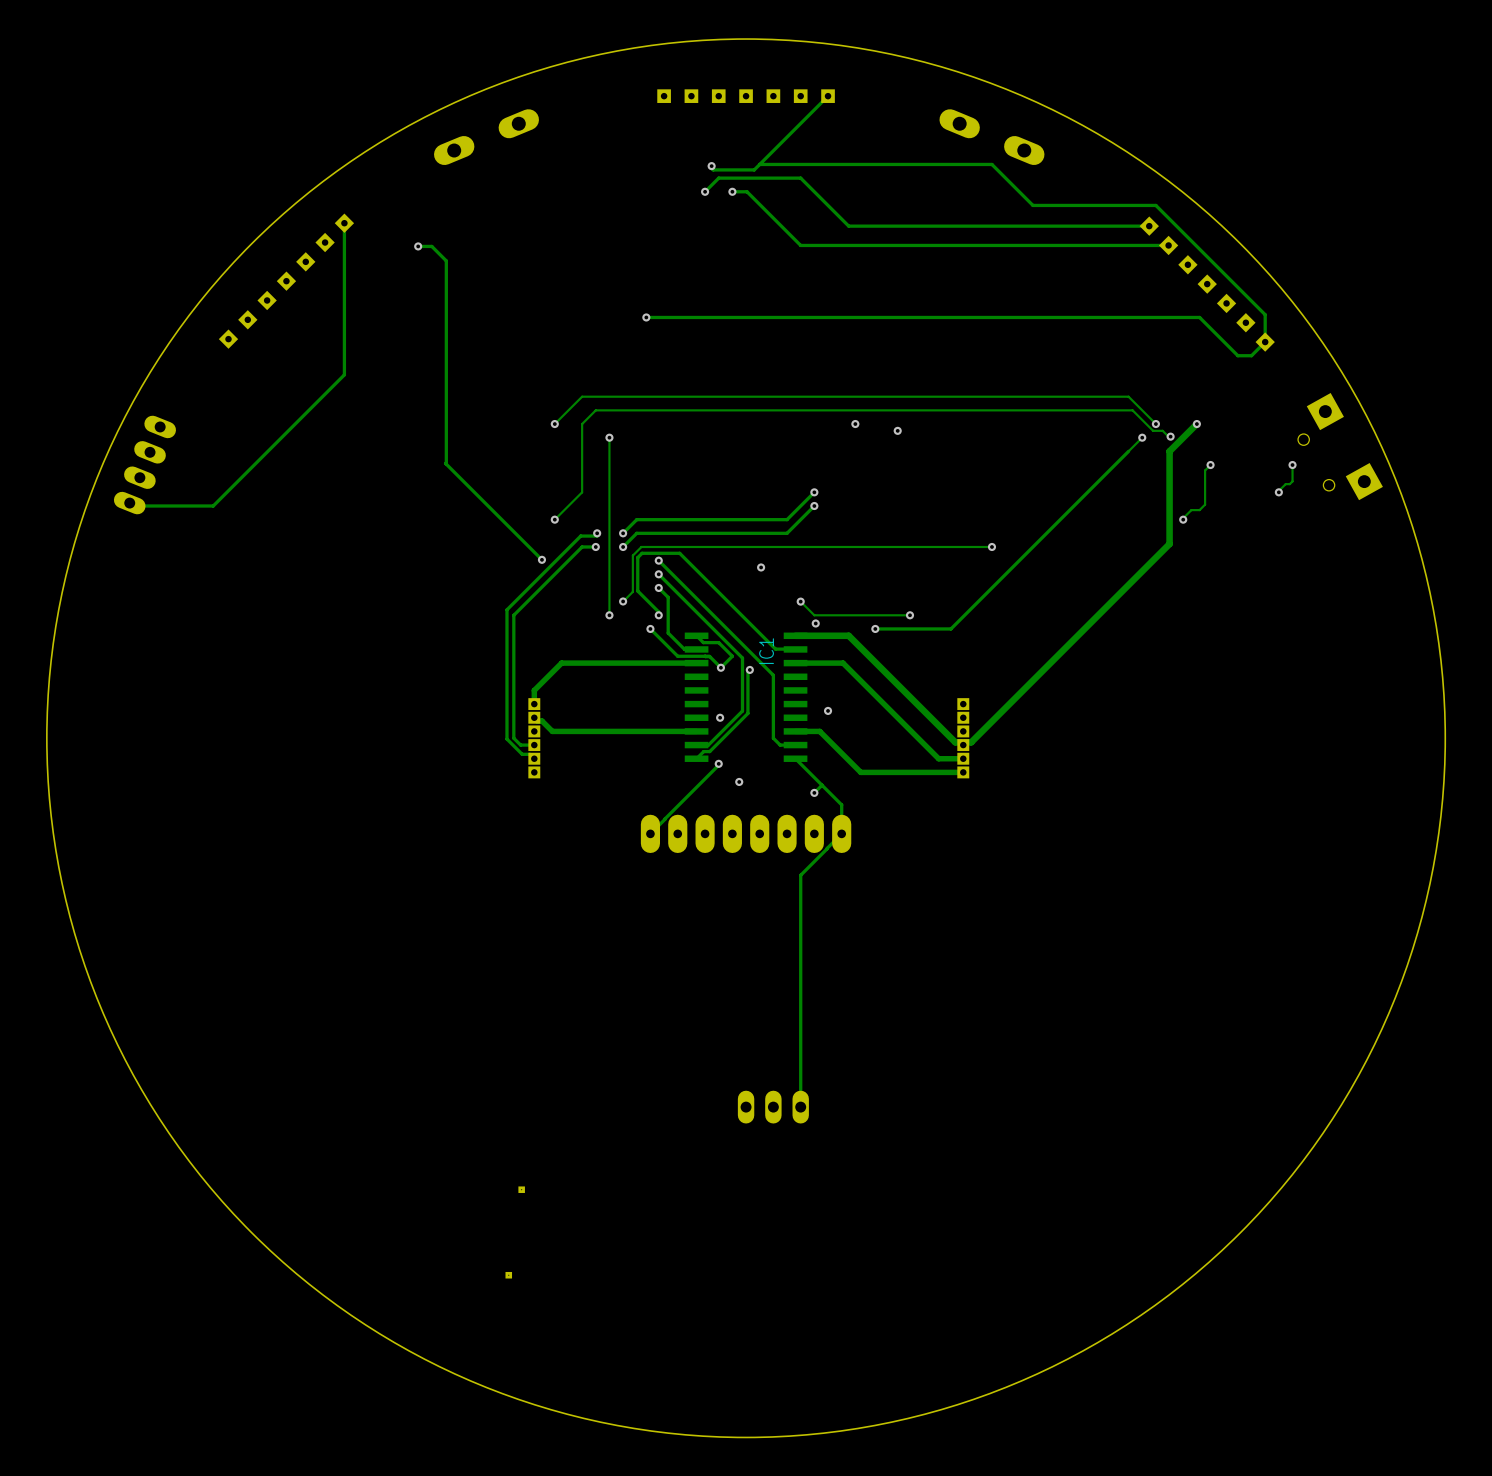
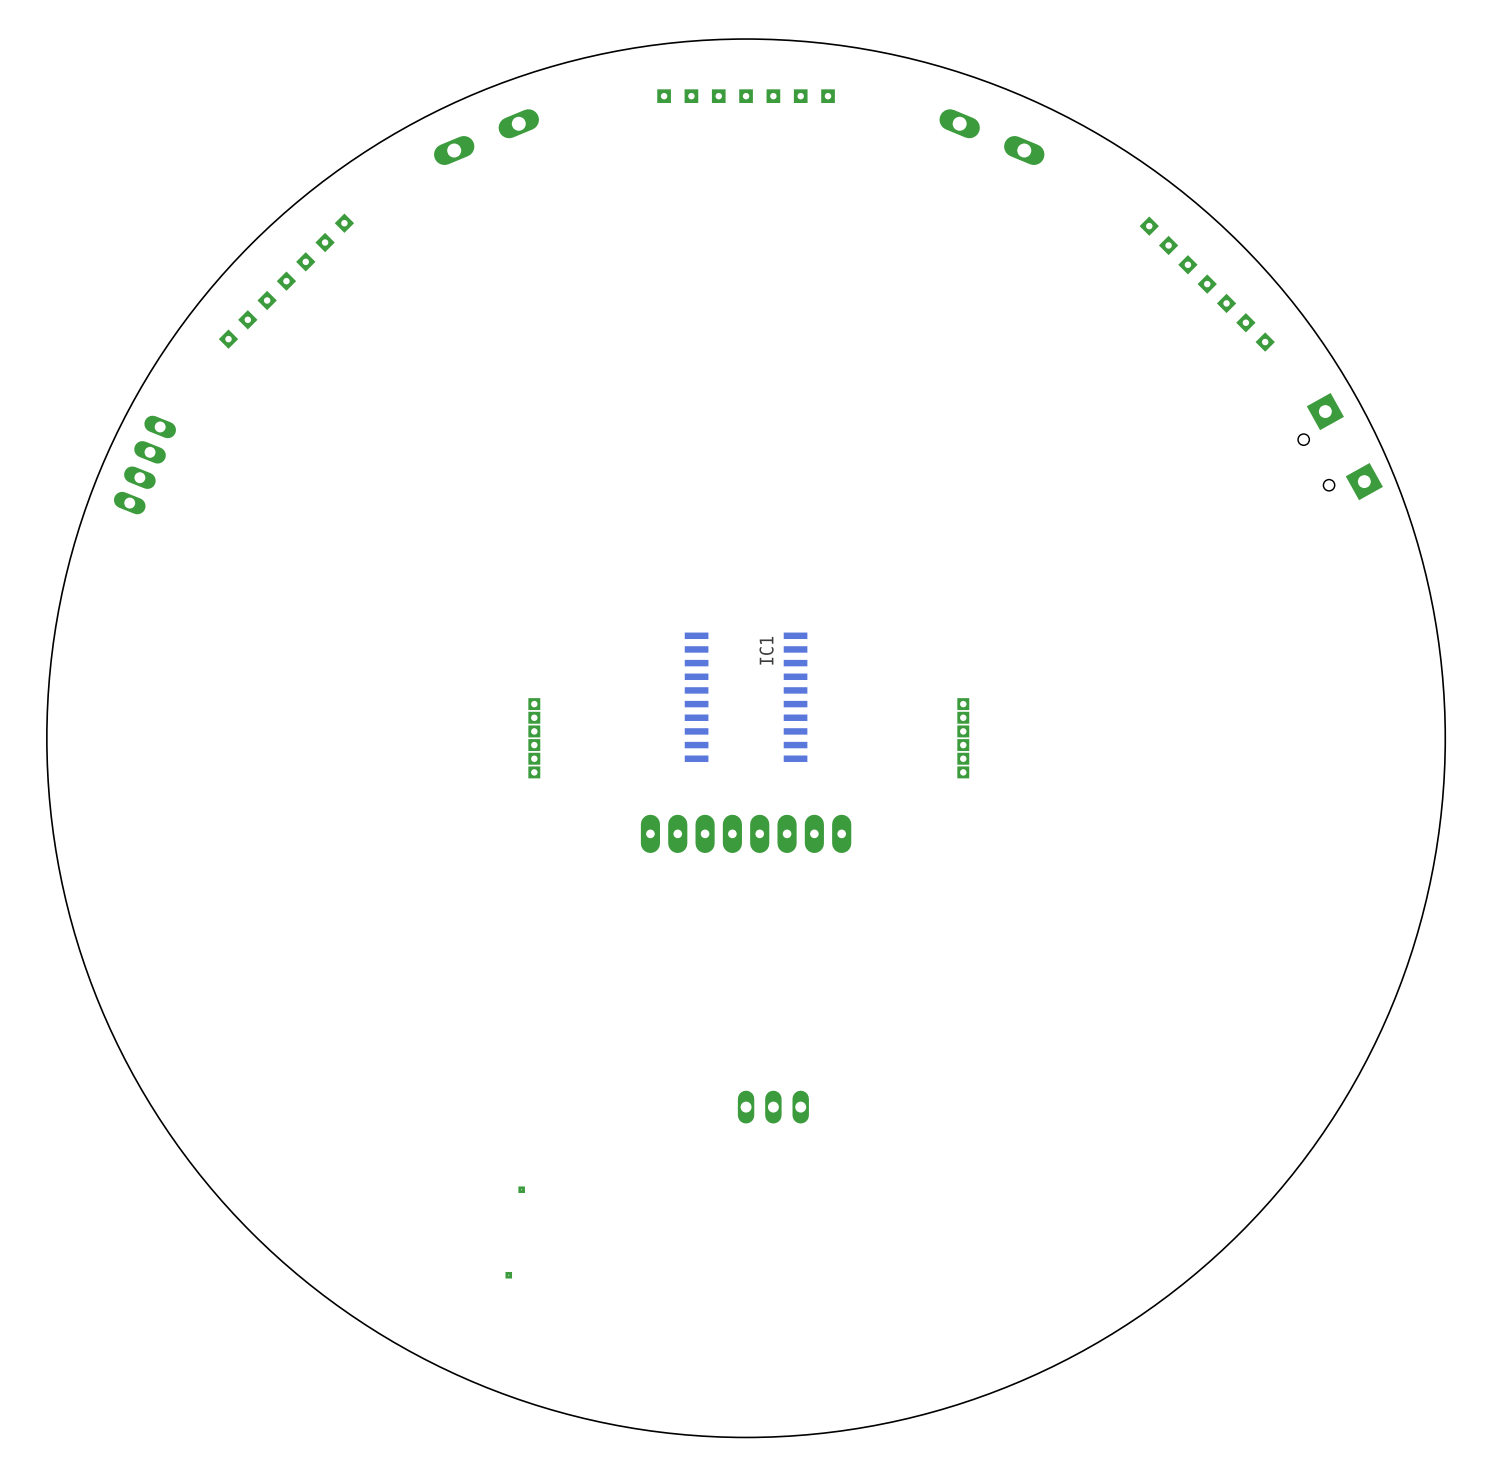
track: (828, 96) (754, 169) (713, 169) (711, 166) -> none
track: (759, 164) (991, 164) (1032, 205) (1155, 205) (1265, 314) (1265, 342) (1251, 355) (1237, 355) (1199, 317) (646, 317) -> none
via: (711, 166) -> none
track: (705, 191) (718, 178) (800, 178) (848, 226) (1149, 226) -> none
via: (705, 191) -> none
track: (732, 191) (747, 191) (800, 245) (1168, 245) -> none
via: (732, 191) -> none
track: (344, 223) (344, 374) (213, 506) (132, 506) (129, 503) -> none
track: (418, 246) (431, 246) (446, 260) (446, 464) -> none
via: (418, 246) -> none
via: (646, 317) -> none
via: (554, 424) -> none
via: (855, 424) -> none
track: (1155, 424) (1128, 396) (582, 396) (554, 424) -> none
via: (1155, 424) -> none
track: (1196, 424) (1169, 451) (1169, 544) (971, 742) (966, 742) (963, 745) (960, 742) (955, 742) (848, 635) (795, 635) -> none
via: (1196, 424) -> none
via: (897, 430) -> none
track: (1170, 436) (1162, 430) (1153, 430) (1132, 410) (595, 410) (582, 424) (582, 492) (554, 519) -> none
via: (1170, 436) -> none
track: (609, 437) (609, 615) -> none
via: (609, 437) -> none
track: (1142, 437) (950, 628) (875, 628) -> none
via: (1142, 437) -> none
track: (445, 463) (541, 559) -> none
track: (1210, 465) (1205, 470) (1205, 504) (1199, 510) (1191, 510) (1183, 519) -> none
via: (1210, 465) -> none
track: (1292, 465) (1292, 481) (1289, 484) (1285, 484) (1278, 492) -> none
via: (1292, 465) -> none
track: (814, 492) (787, 519) (636, 519) (623, 533) -> none
via: (814, 492) -> none
via: (1278, 492) -> none
track: (814, 506) (787, 533) (636, 533) (623, 546) -> none
via: (814, 506) -> none
via: (554, 519) -> none
via: (1183, 519) -> none
track: (597, 533) (597, 536) (580, 536) (506, 609) (506, 739) (522, 754) (529, 754) (534, 758) -> none
via: (597, 533) -> none
via: (623, 533) -> none
track: (595, 546) (582, 546) (513, 615) (513, 738) (520, 745) (534, 745) -> none
via: (595, 546) -> none
via: (623, 546) -> none
track: (991, 546) (641, 546) (632, 555) (632, 591) (623, 601) -> none
via: (991, 546) -> none
via: (541, 559) -> none
track: (658, 560) (773, 675) (773, 738) (780, 745) (795, 745) -> none
via: (658, 560) -> none
via: (761, 567) -> none
track: (658, 574) (742, 658) (742, 711) (708, 745) (696, 745) -> none
via: (658, 574) -> none
track: (658, 587) (668, 597) (668, 633) (684, 649) (696, 649) -> none
via: (658, 587) -> none
via: (623, 601) -> none
track: (800, 601) (814, 615) (910, 615) -> none
via: (800, 601) -> none
via: (609, 615) -> none
track: (658, 615) (658, 612) (637, 591) (637, 557) (642, 553) (679, 553) (775, 649) (795, 649) -> none
via: (658, 615) -> none
via: (910, 615) -> none
via: (815, 623) -> none
track: (650, 628) (677, 656) (709, 656) -> none
via: (650, 628) -> none
via: (875, 628) -> none
track: (702, 635) (696, 635) (703, 642) (718, 642) (732, 656) (720, 667) (709, 656) (705, 656) -> none
track: (696, 663) (561, 663) (534, 690) (534, 704) -> none
track: (795, 663) (843, 663) (938, 758) (963, 758) -> none
via: (720, 667) -> none
track: (749, 669) (747, 669) (747, 713) (709, 751) (703, 751) (696, 758) -> none
via: (749, 669) -> none
via: (828, 710) -> none
track: (534, 717) (537, 721) (542, 721) (552, 731) (696, 731) -> none
via: (720, 717) -> none
track: (795, 731) (819, 731) (860, 772) (963, 772) -> none
track: (795, 758) (841, 804) (841, 833) (800, 875) (800, 1107) -> none
track: (718, 763) (650, 833) -> none
via: (718, 763) -> none
via: (739, 781) -> none
track: (822, 785) (814, 792) -> none
via: (814, 792) -> none

